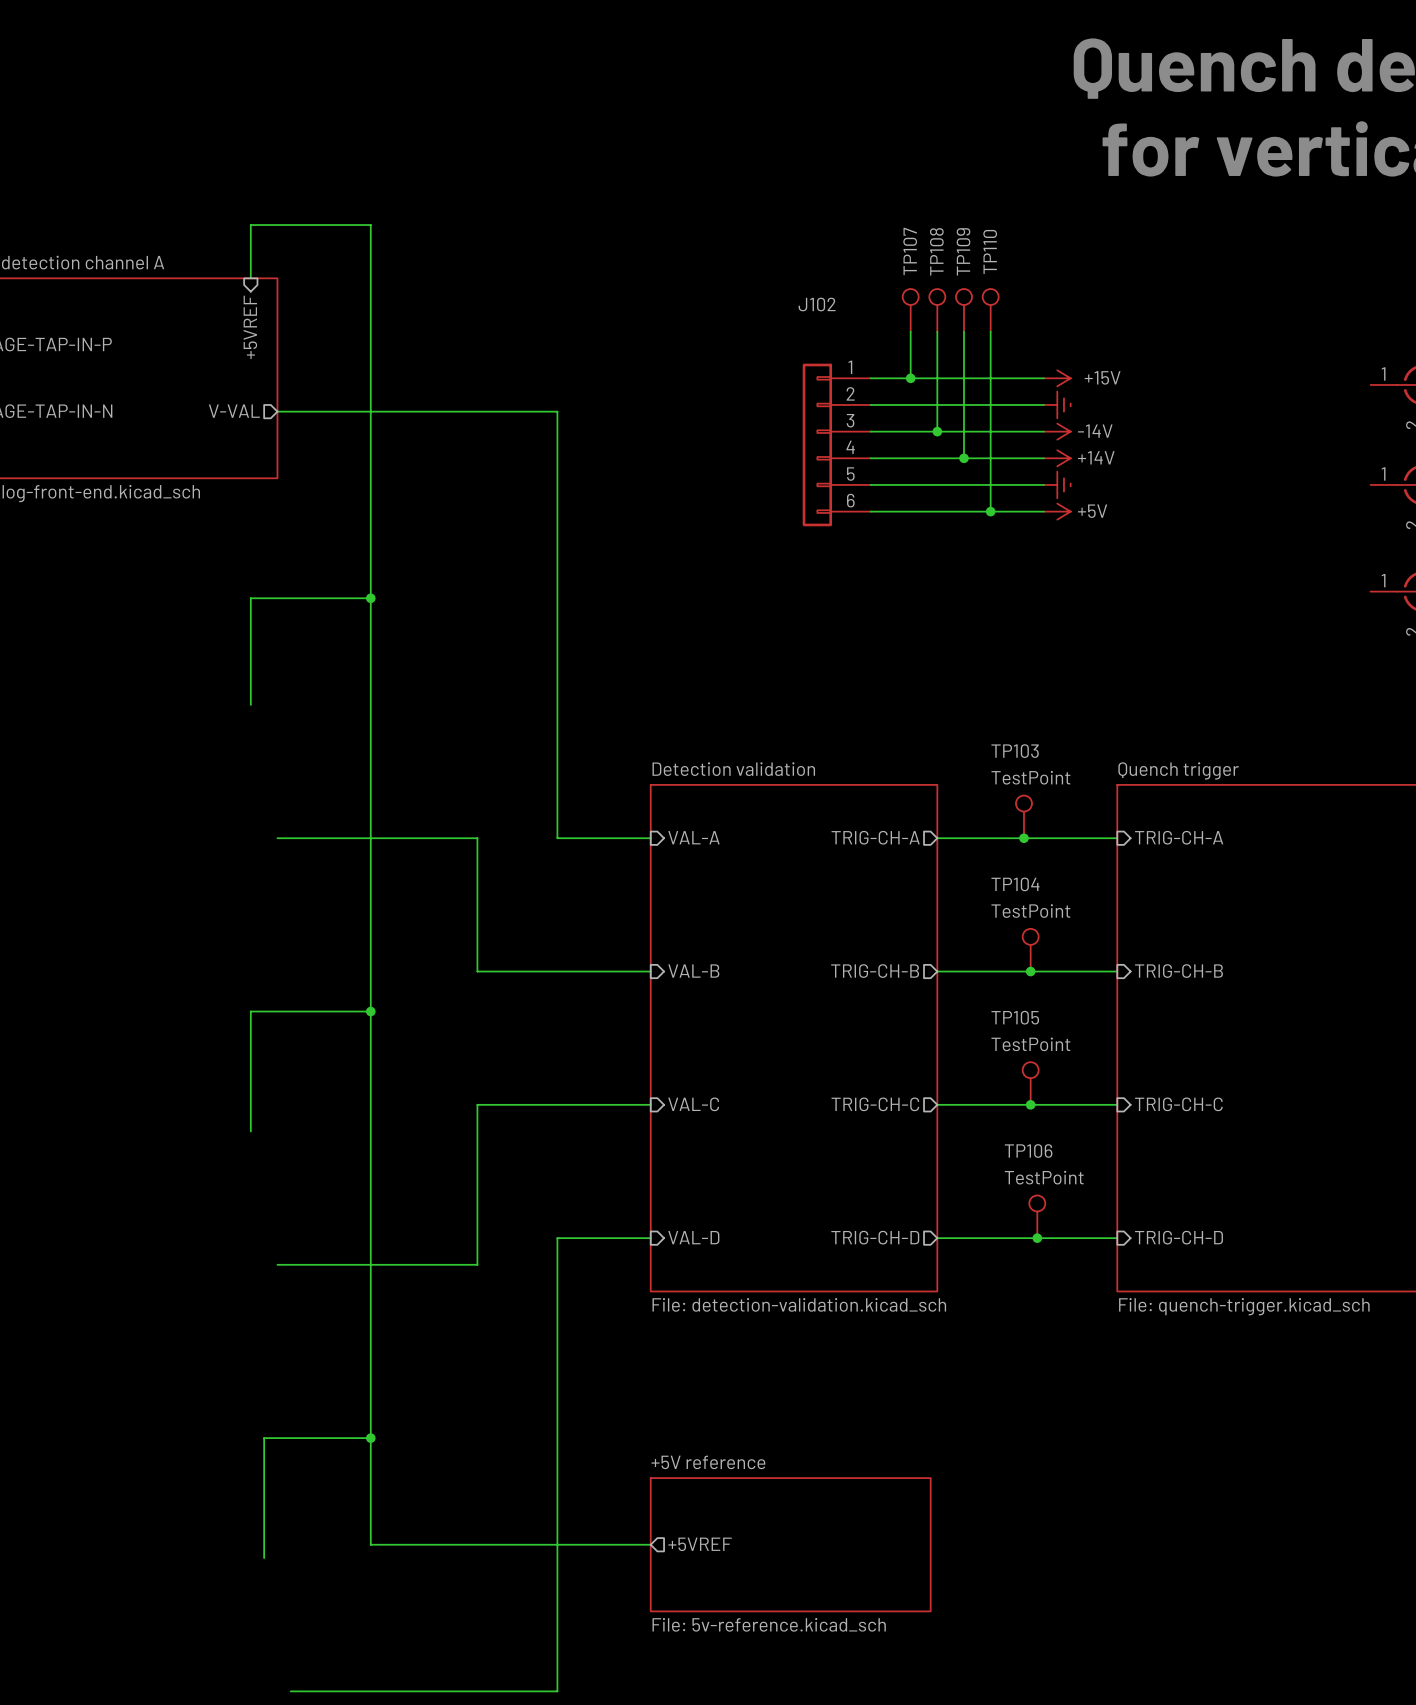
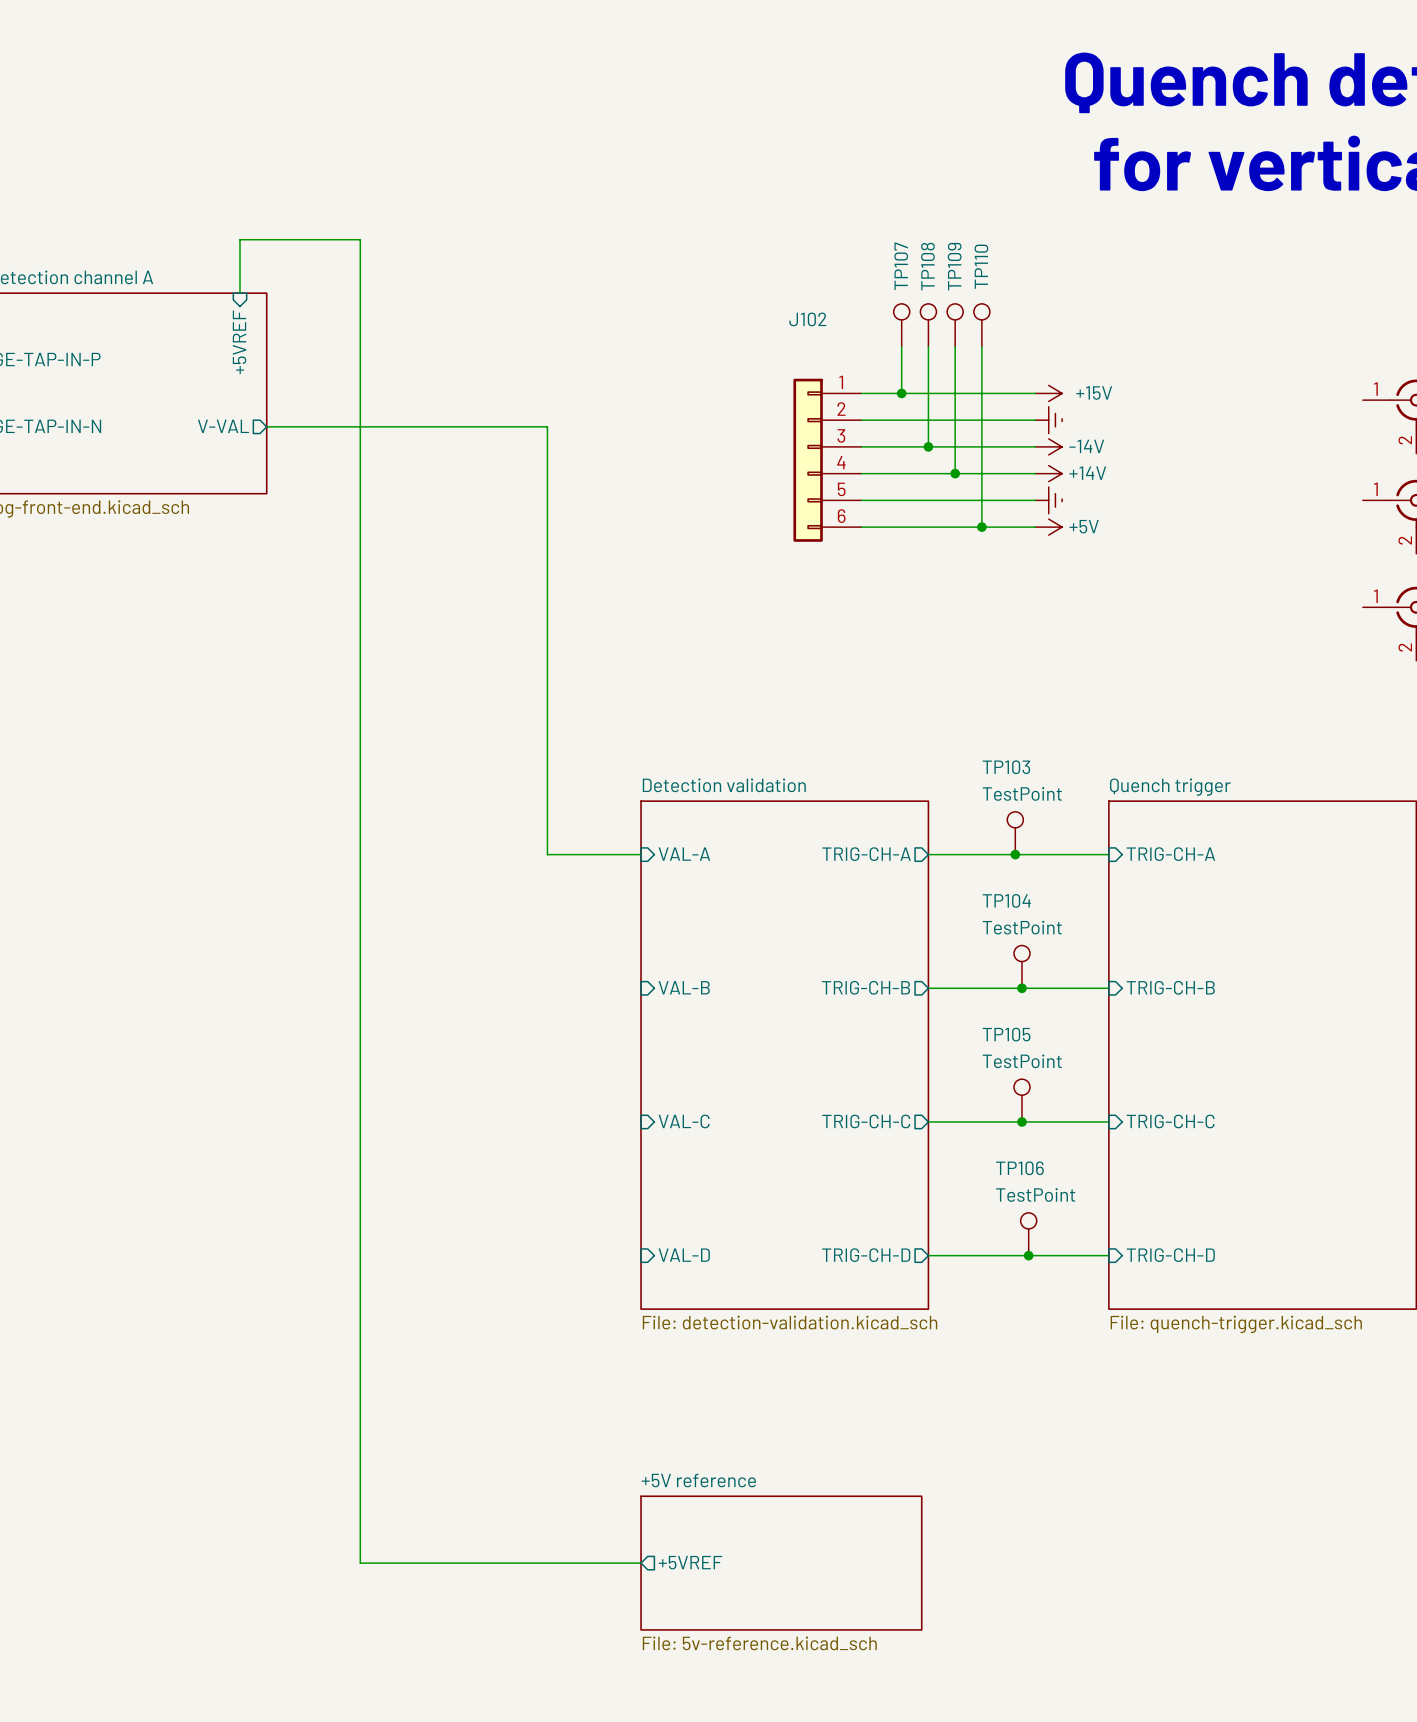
wire: (370, 598) (250, 598) (250, 704) -> none
junction: (370, 598) -> none
wire: (277, 838) (477, 838) (477, 971) (650, 971) -> none
wire: (370, 1011) (250, 1011) (250, 1131) -> none
junction: (370, 1011) -> none
wire: (650, 1104) (477, 1104) (477, 1264) (277, 1264) -> none
wire: (650, 1238) (557, 1238) (557, 1691) (290, 1691) -> none
wire: (370, 1438) (264, 1438) (264, 1558) -> none
junction: (370, 1438) -> none

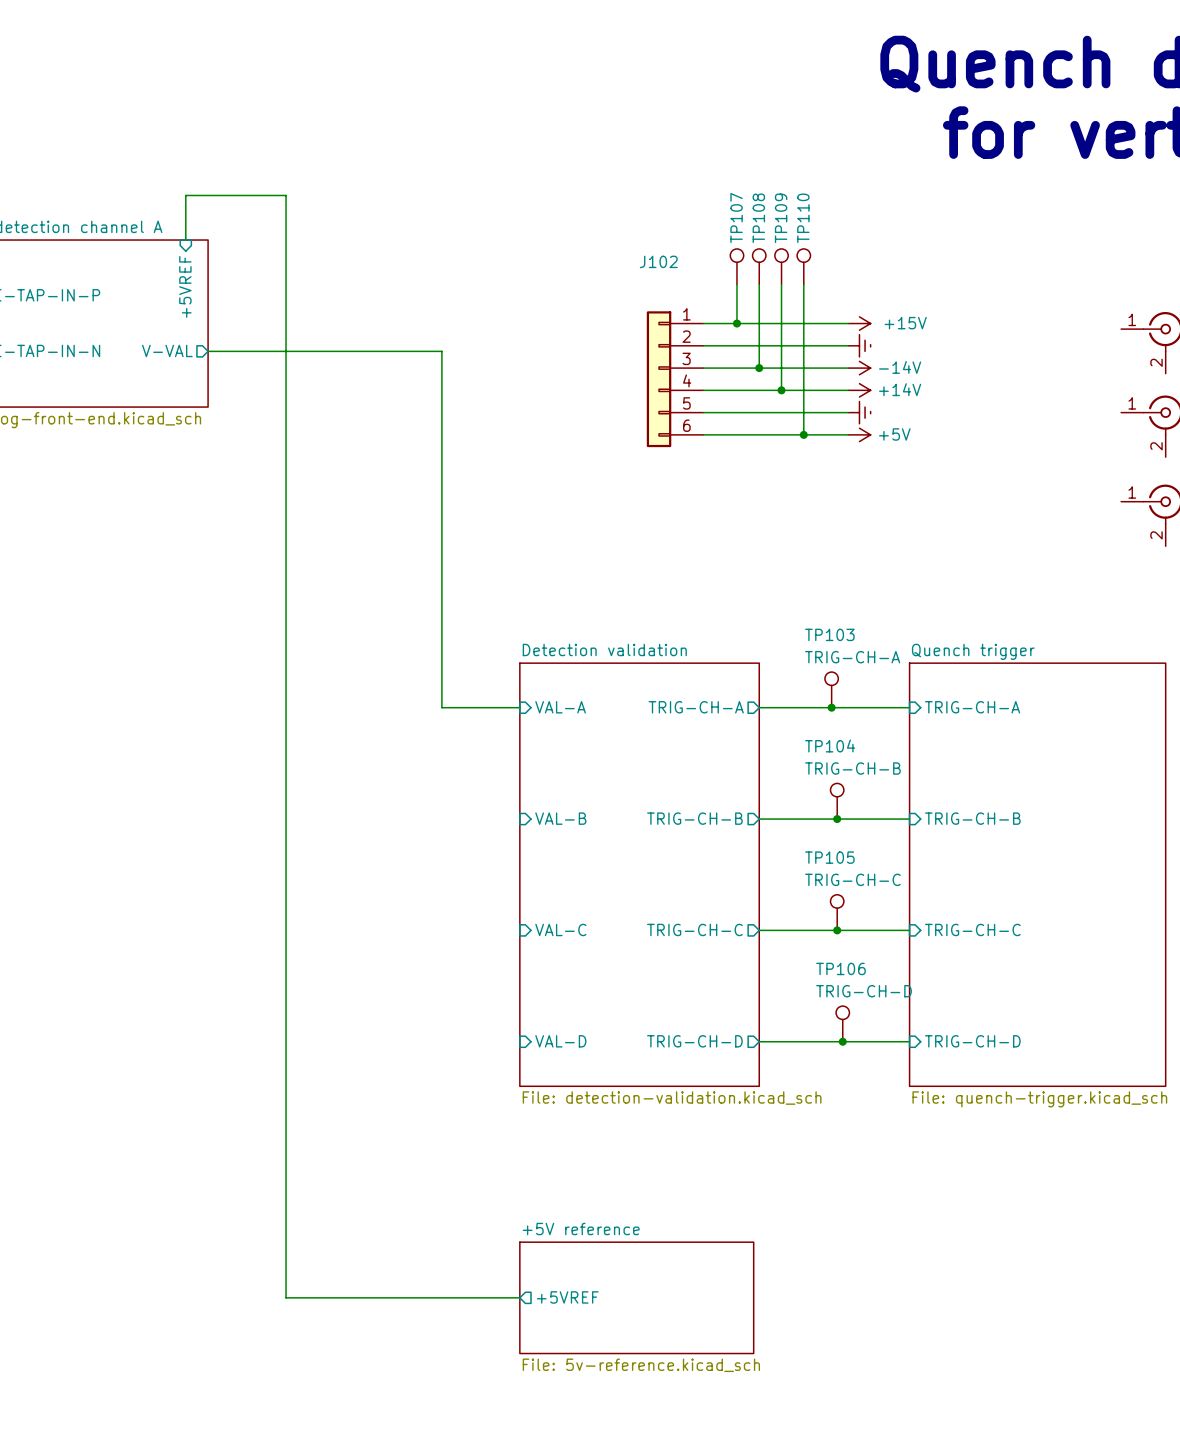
TP103 value: TestPoint (1022, 793) -> TRIG-CH-A (852, 657)
TP104 value: TestPoint (1022, 927) -> TRIG-CH-B (852, 768)
TP105 value: TestPoint (1022, 1061) -> TRIG-CH-C (852, 879)
TP106 value: TestPoint (1035, 1194) -> TRIG-CH-D (864, 991)

